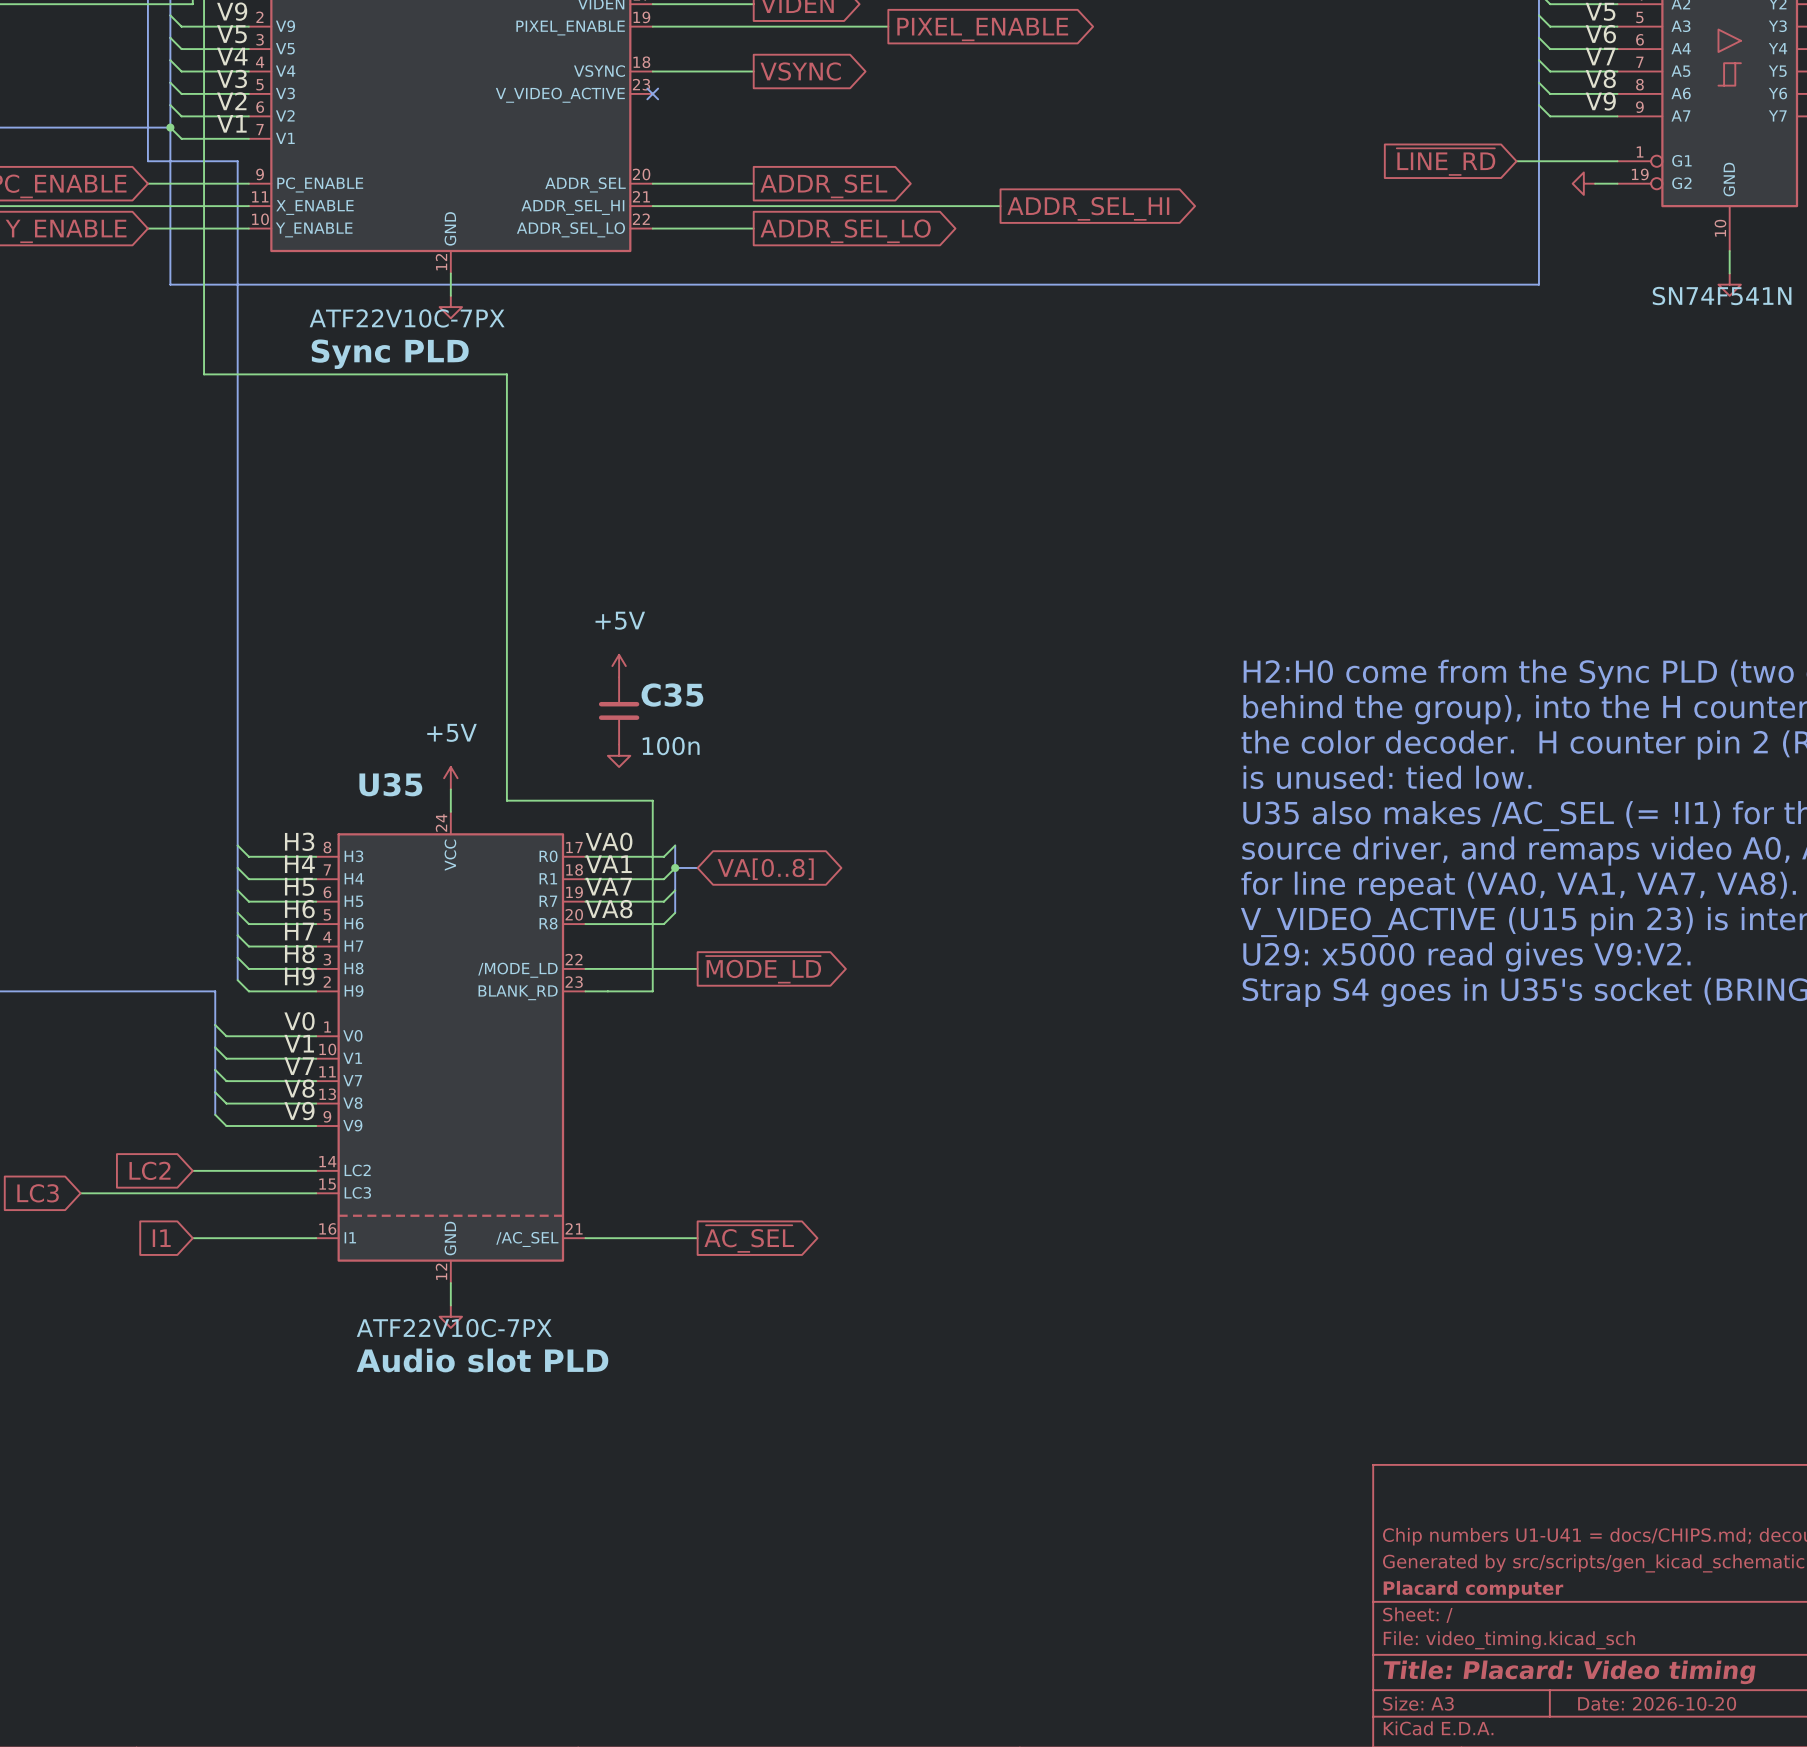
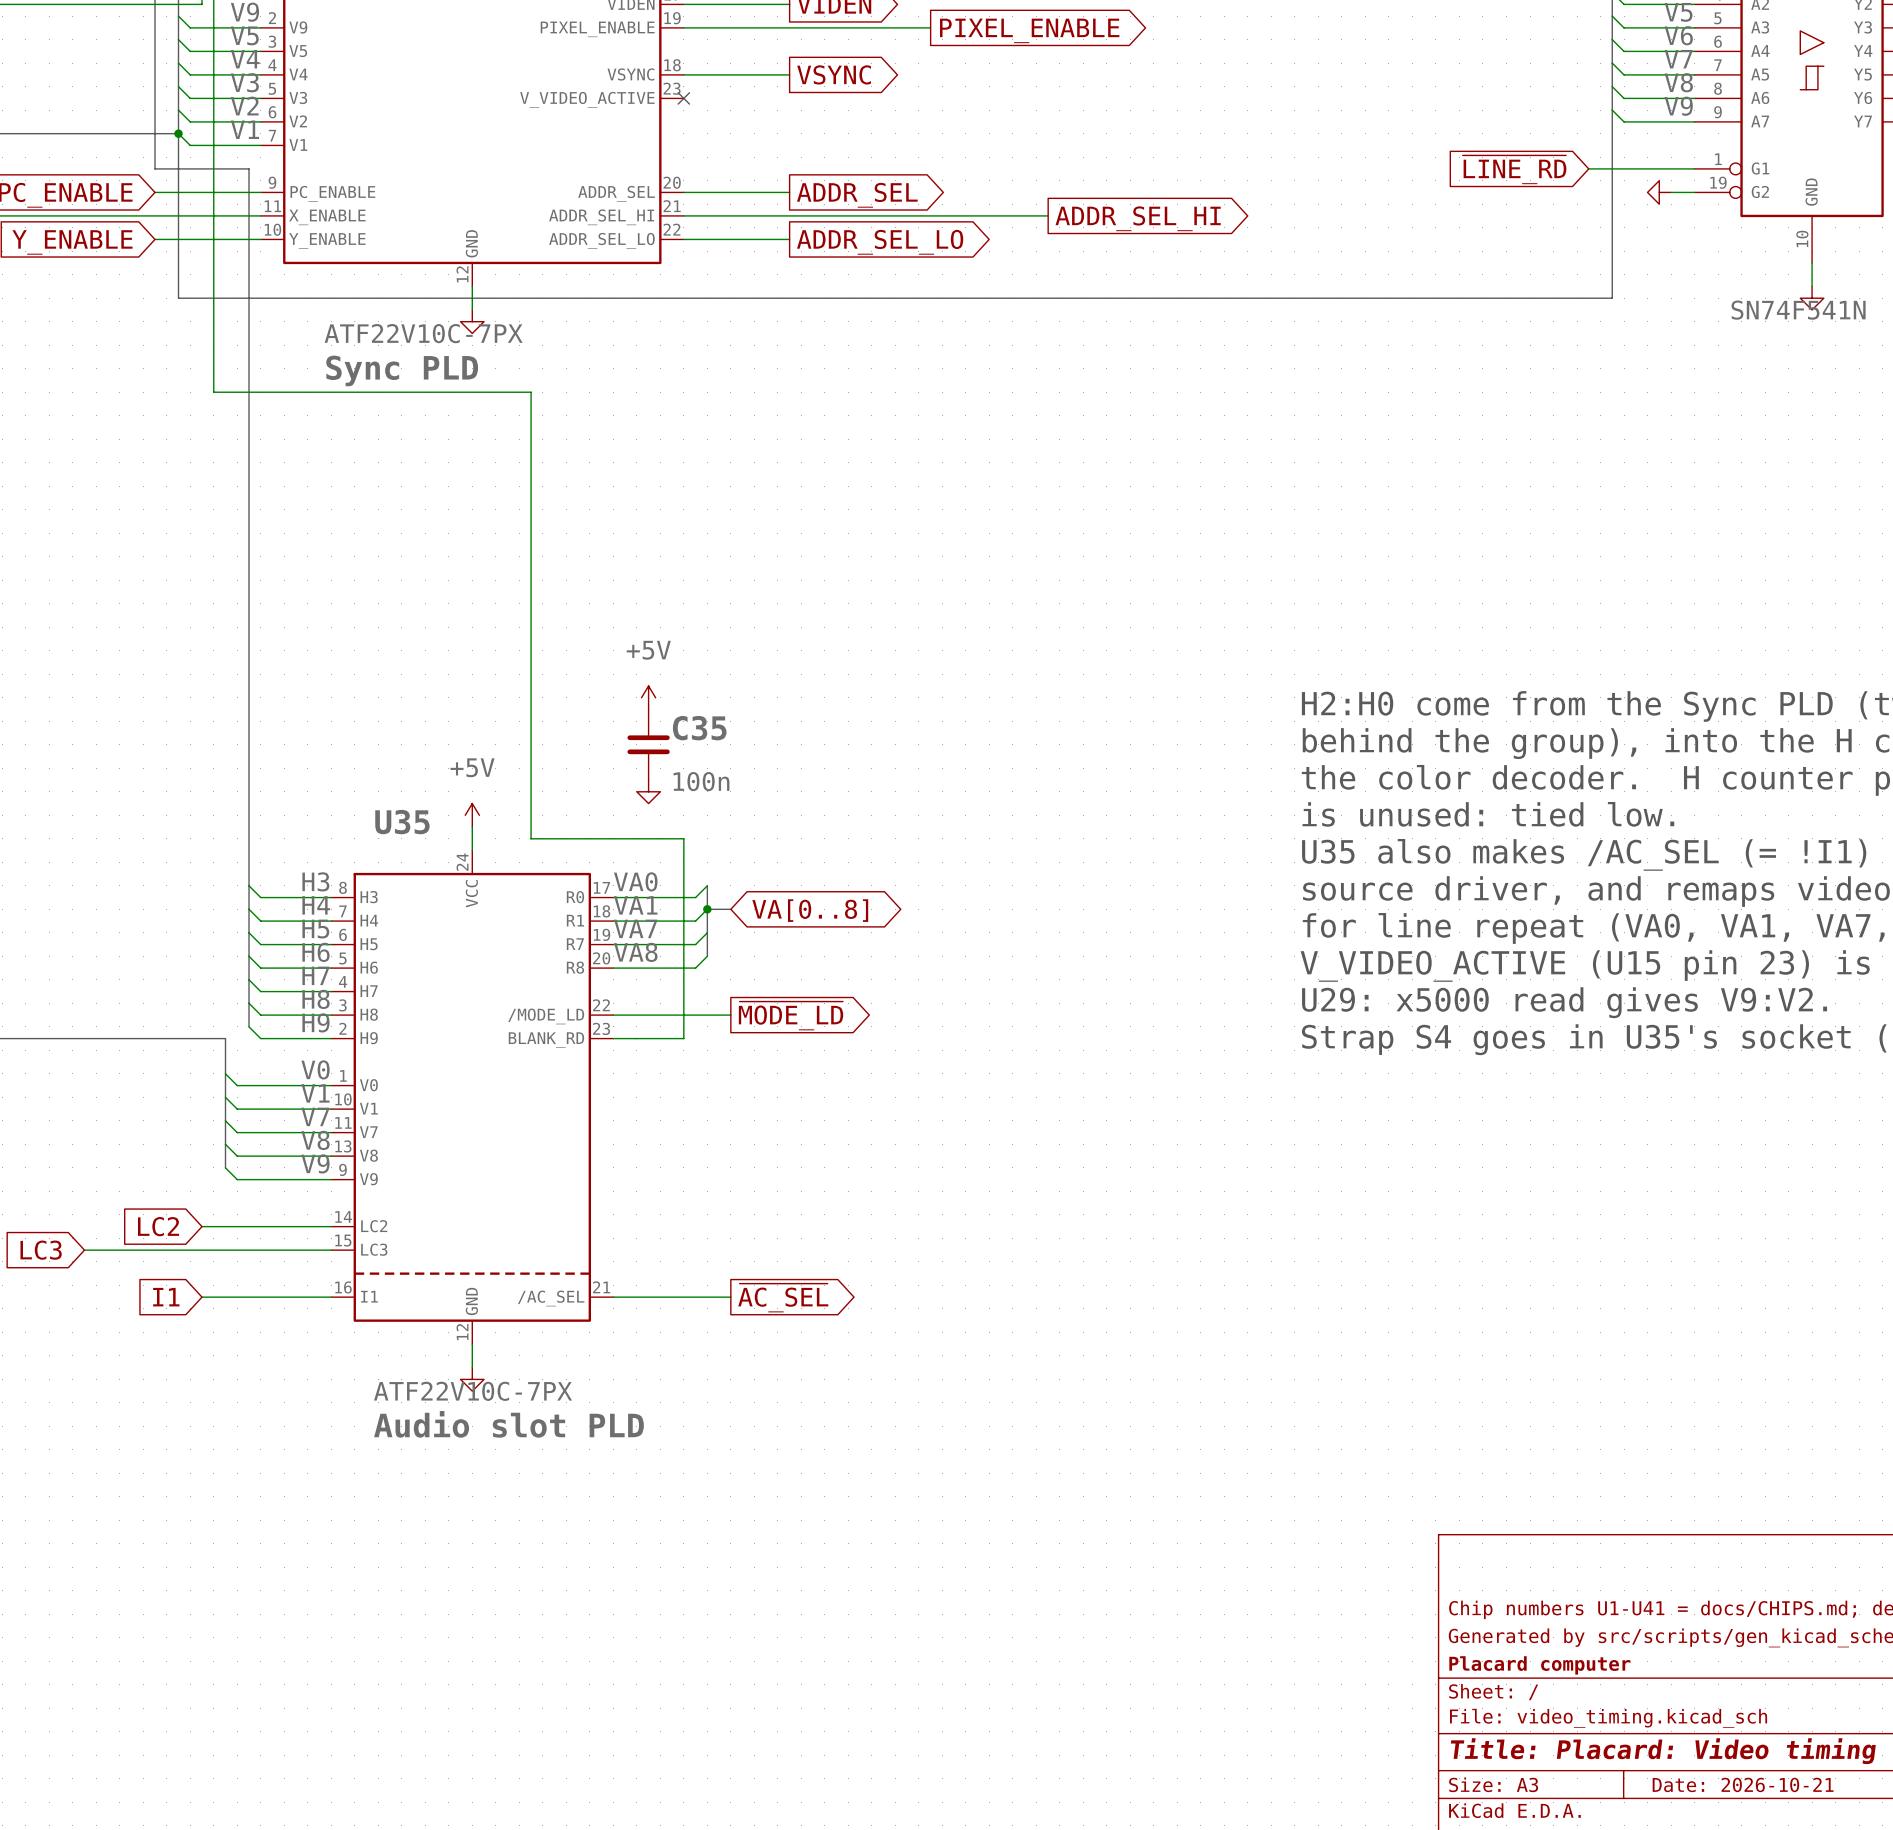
title block: Date: 2026-10-20 (1657, 1703) -> Date: 2026-10-21 (1743, 1784)

